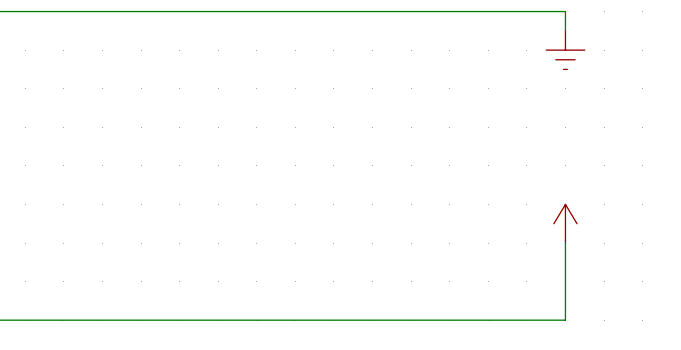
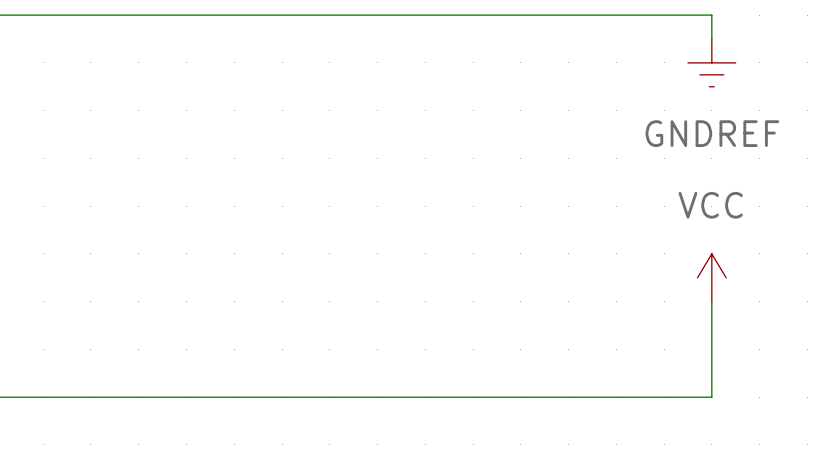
power symbol text: none -> GNDREF (712, 133)
power symbol text: none -> VCC (710, 205)

